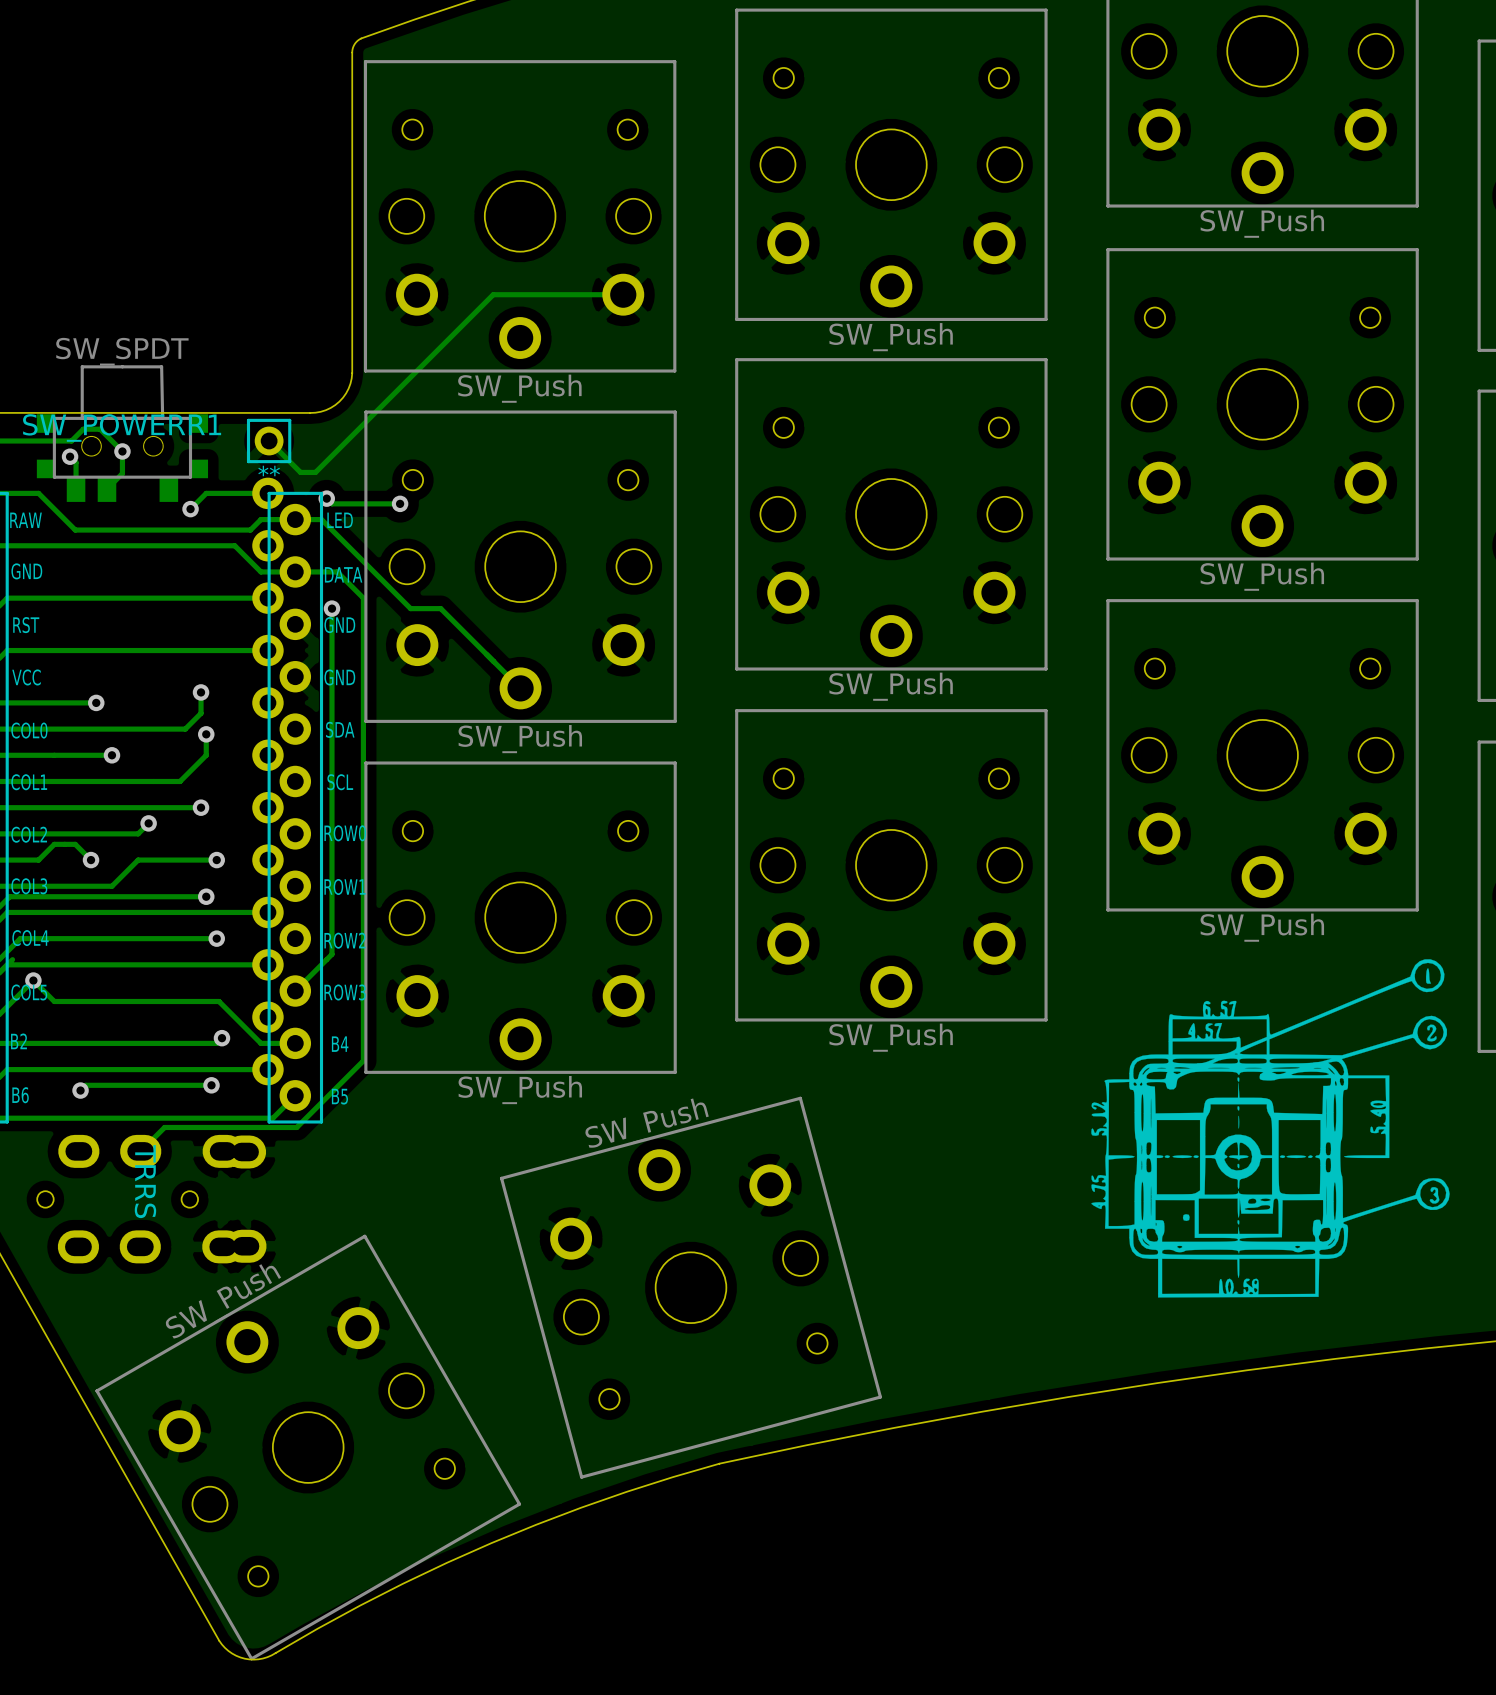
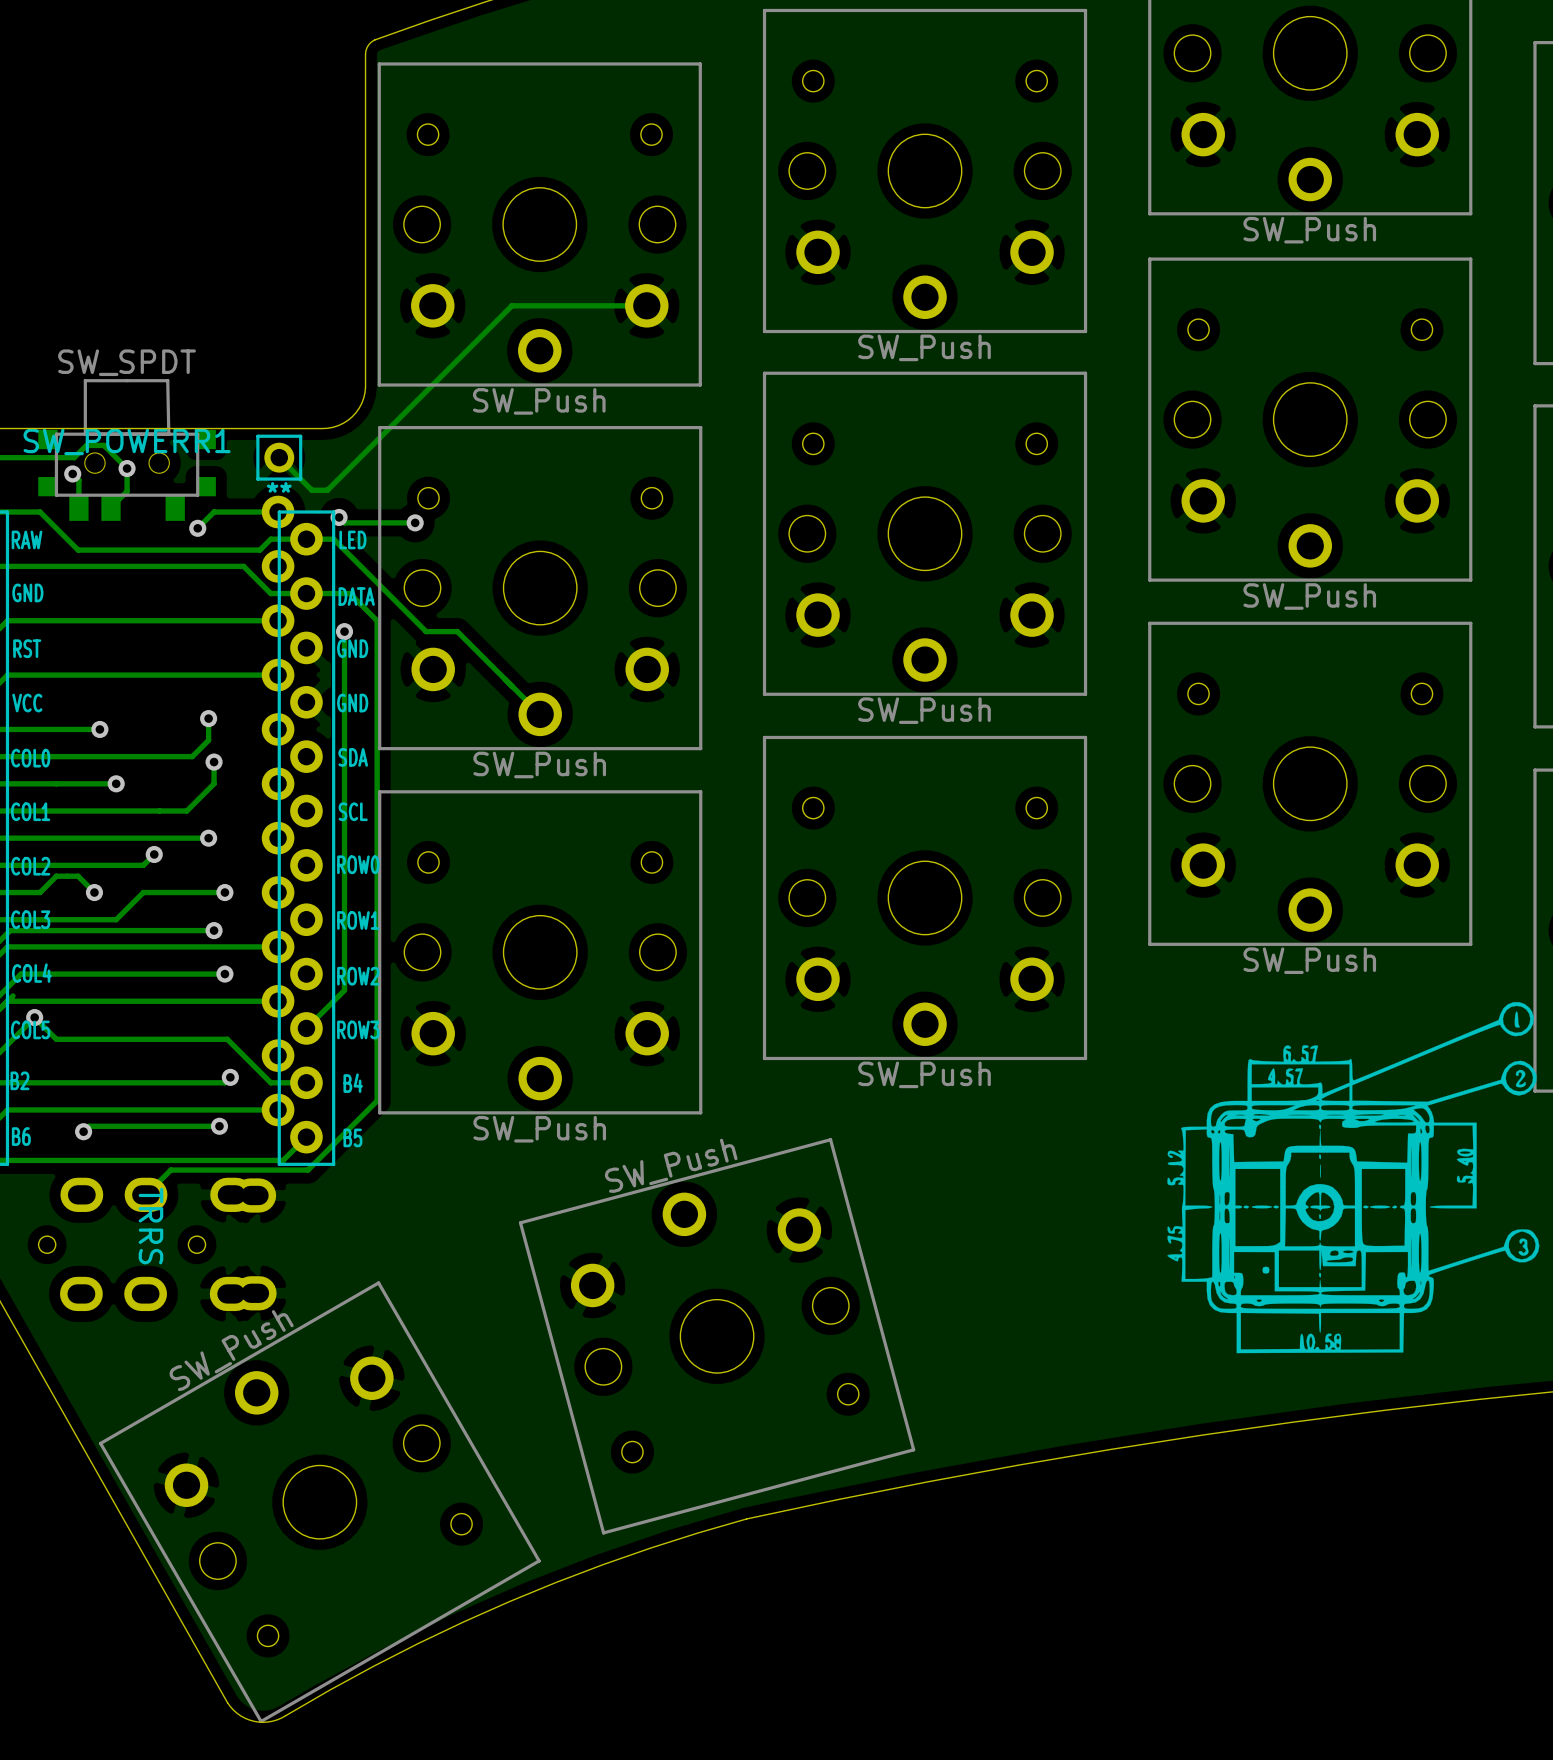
drawing position: (1270, 1128) -> (1353, 1177)

